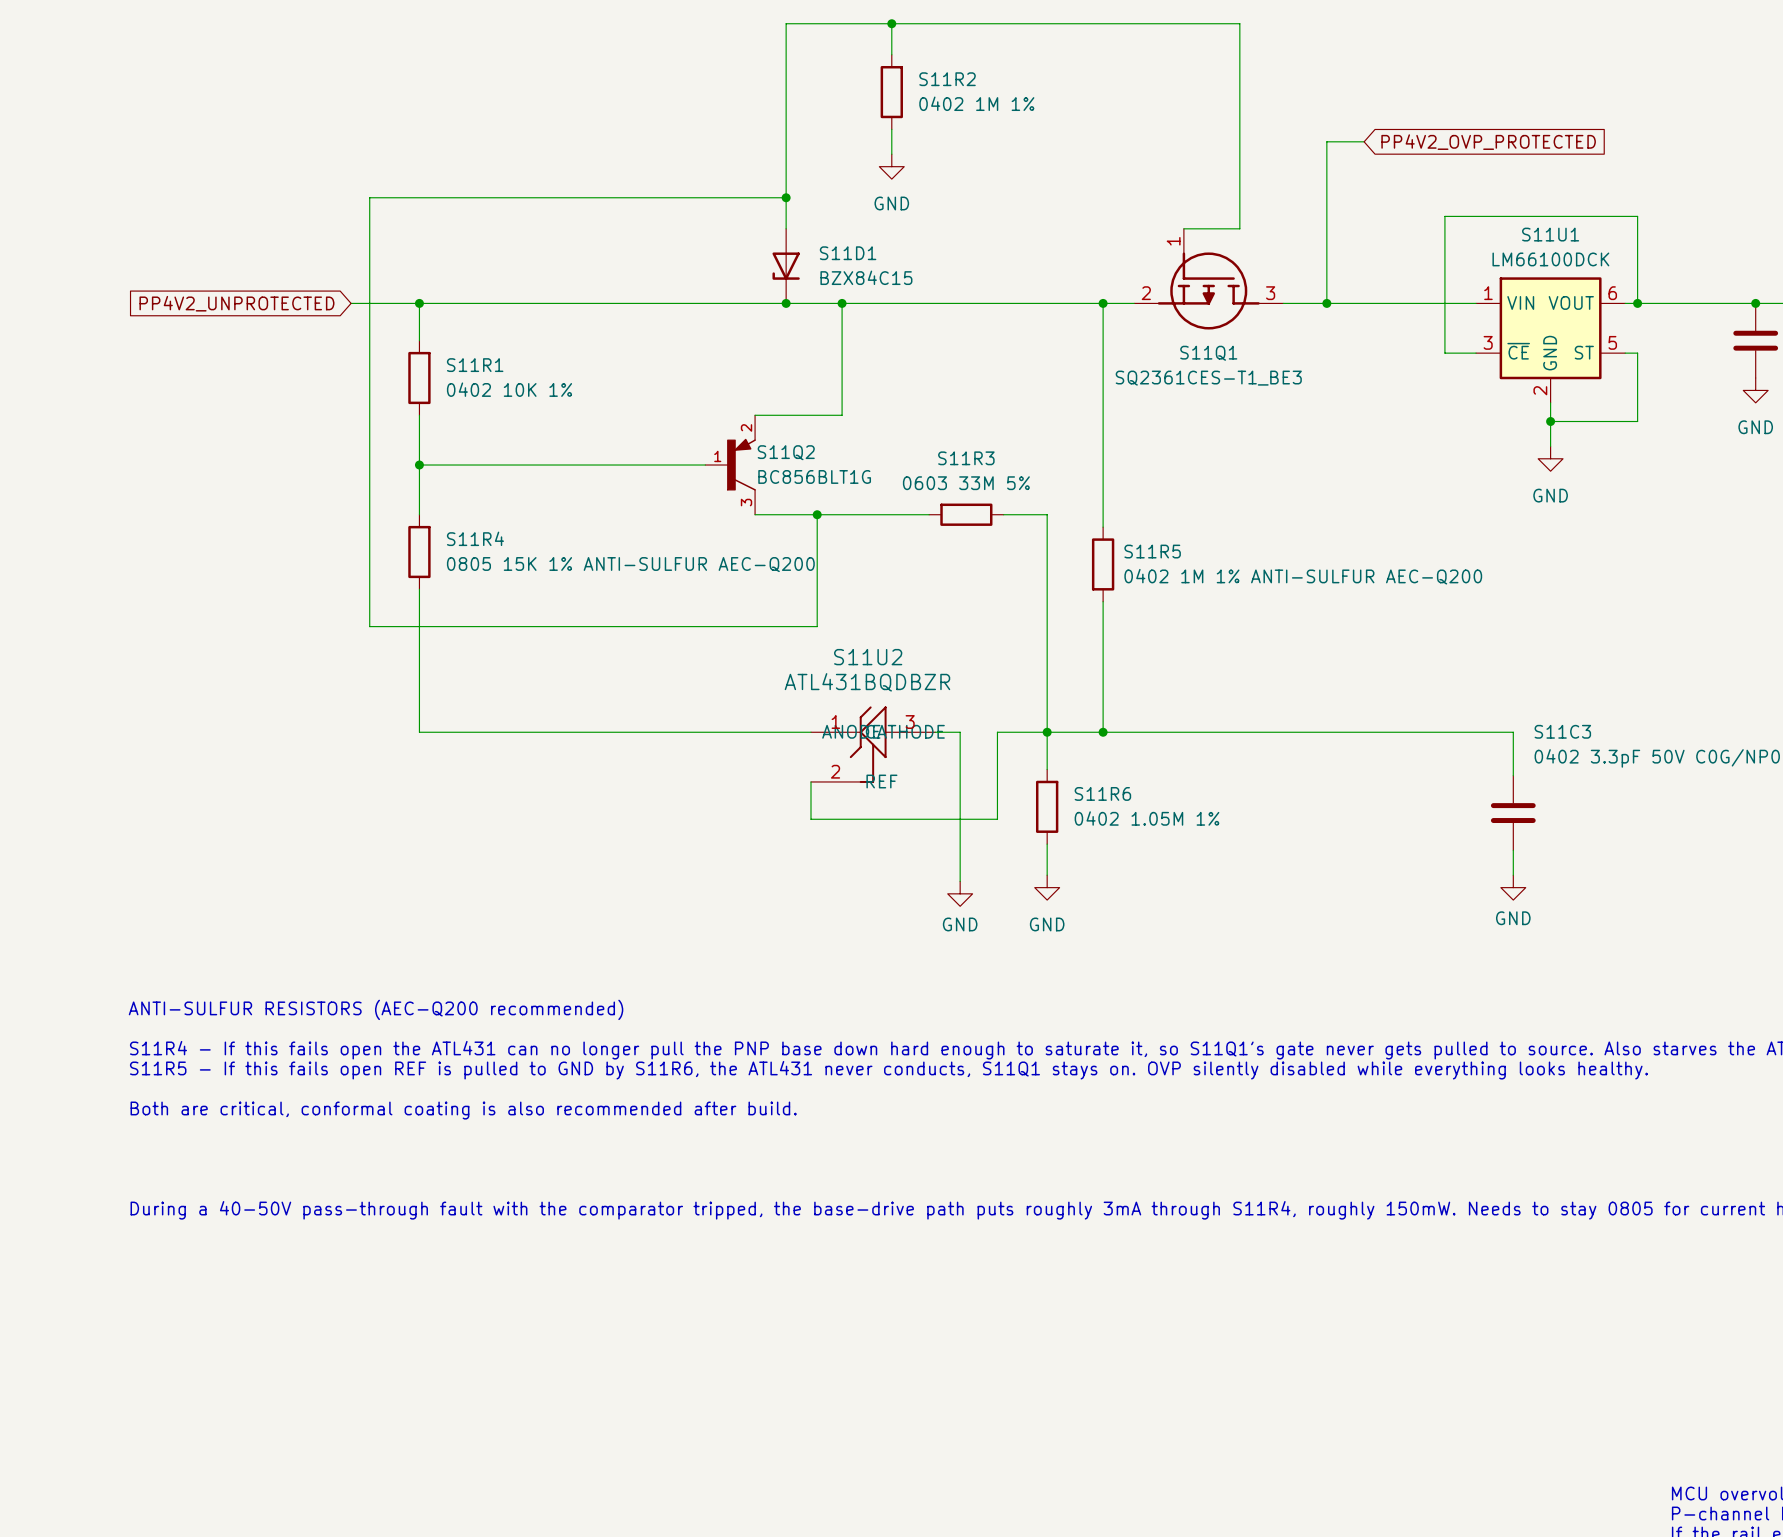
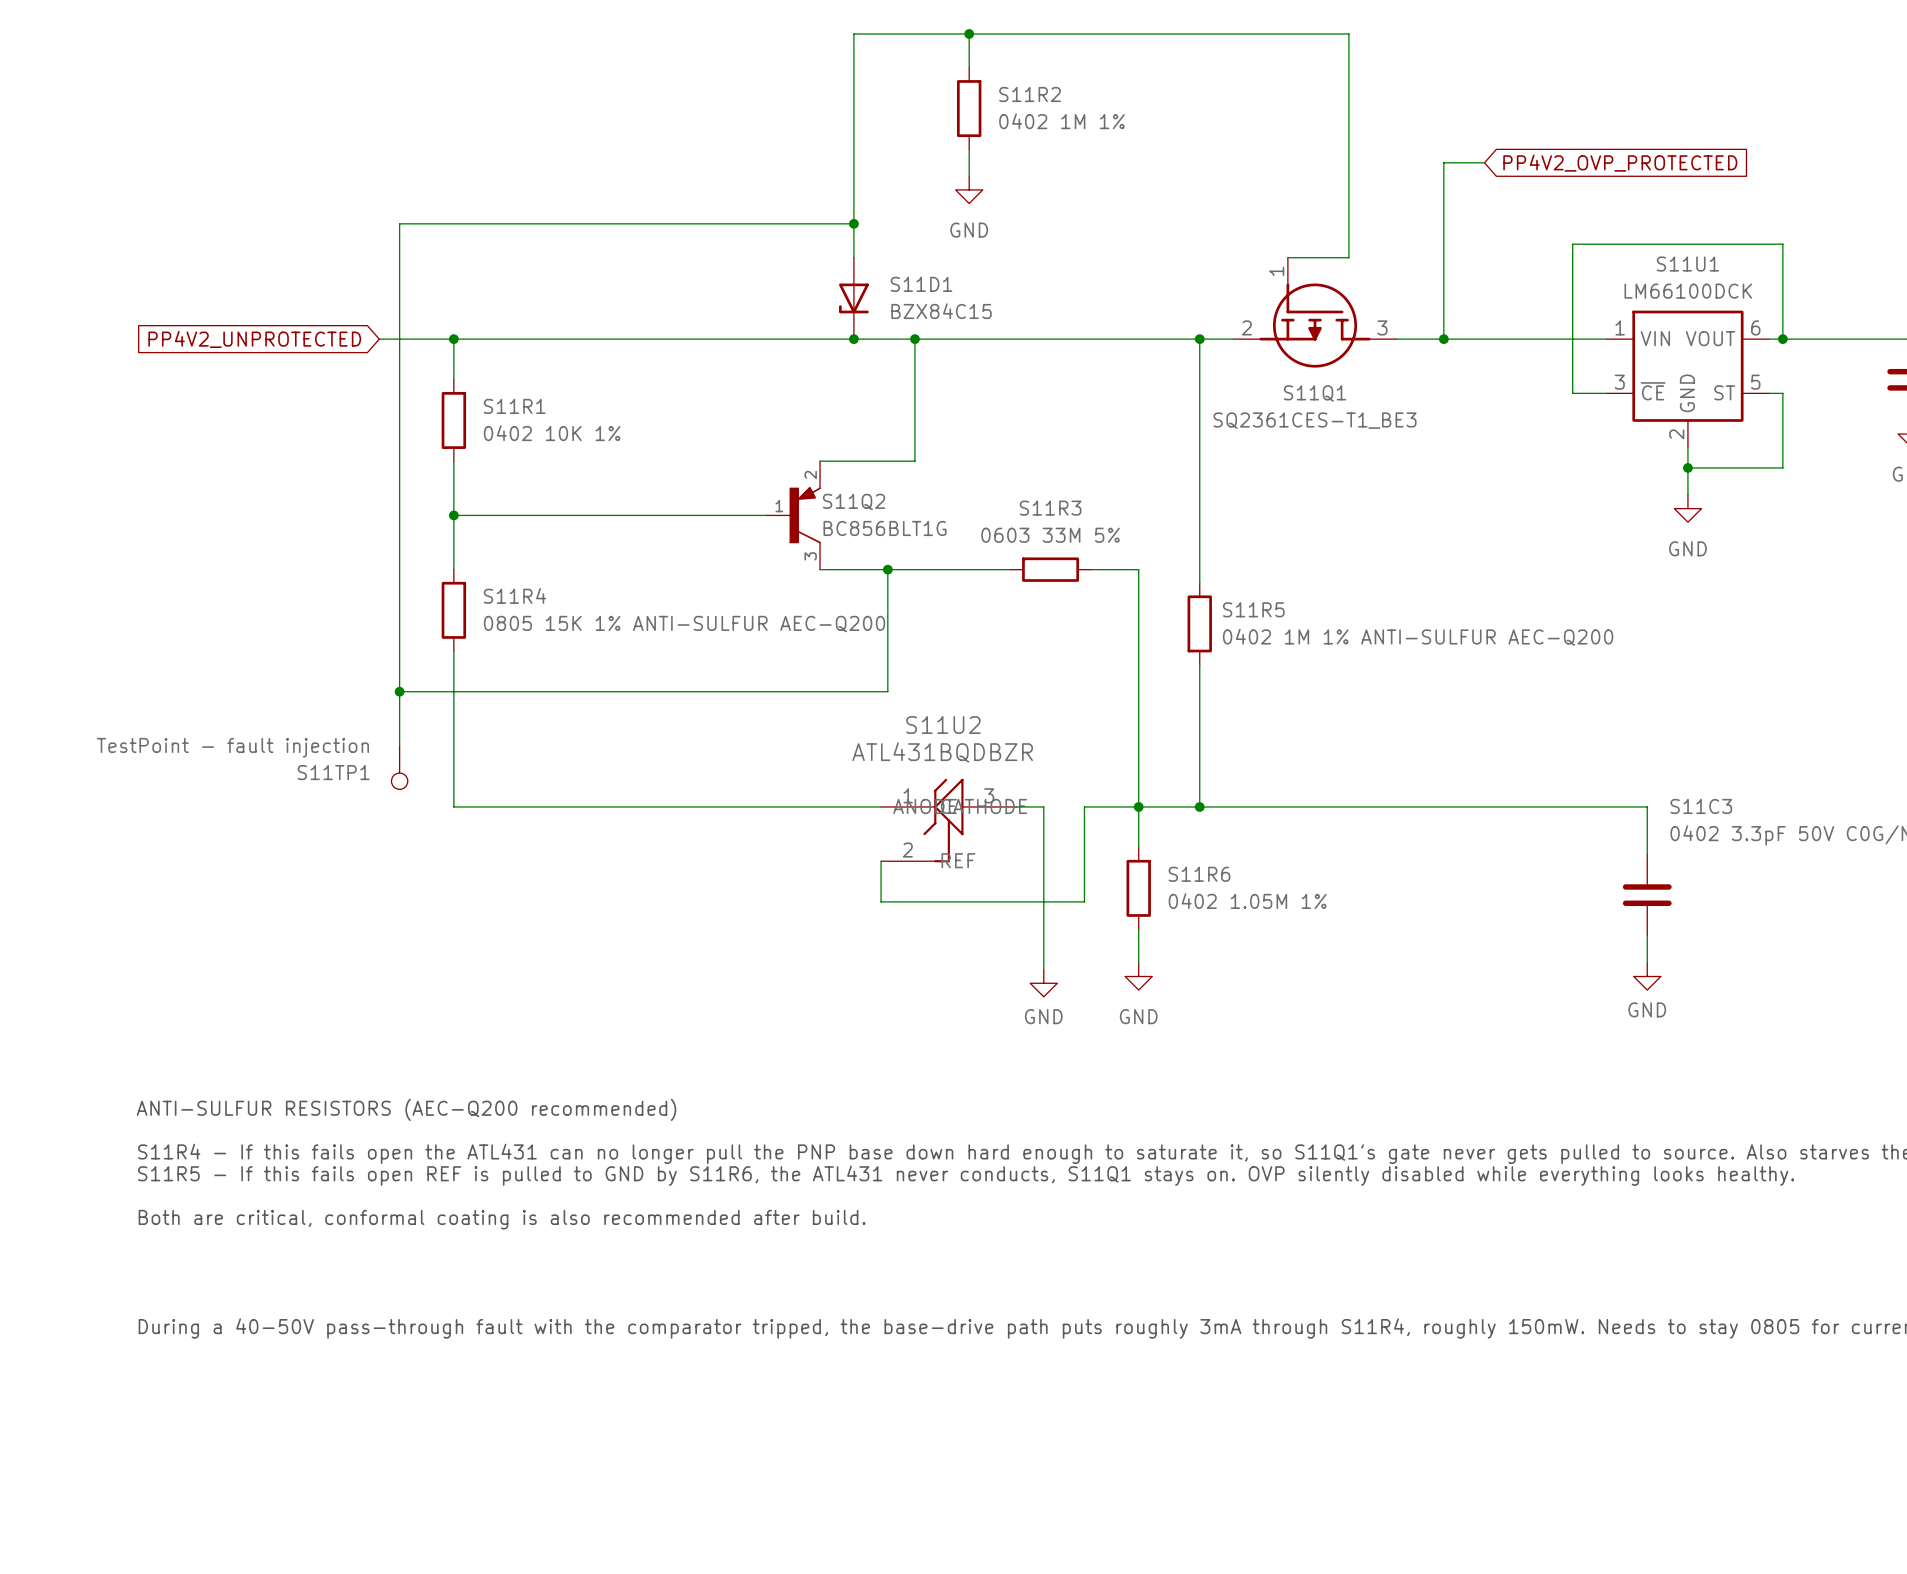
wire: none -> (399, 691) (399, 745)
junction: none -> (399, 691)
S11TP1: none -> TestPoint - fault injection (399, 767)

